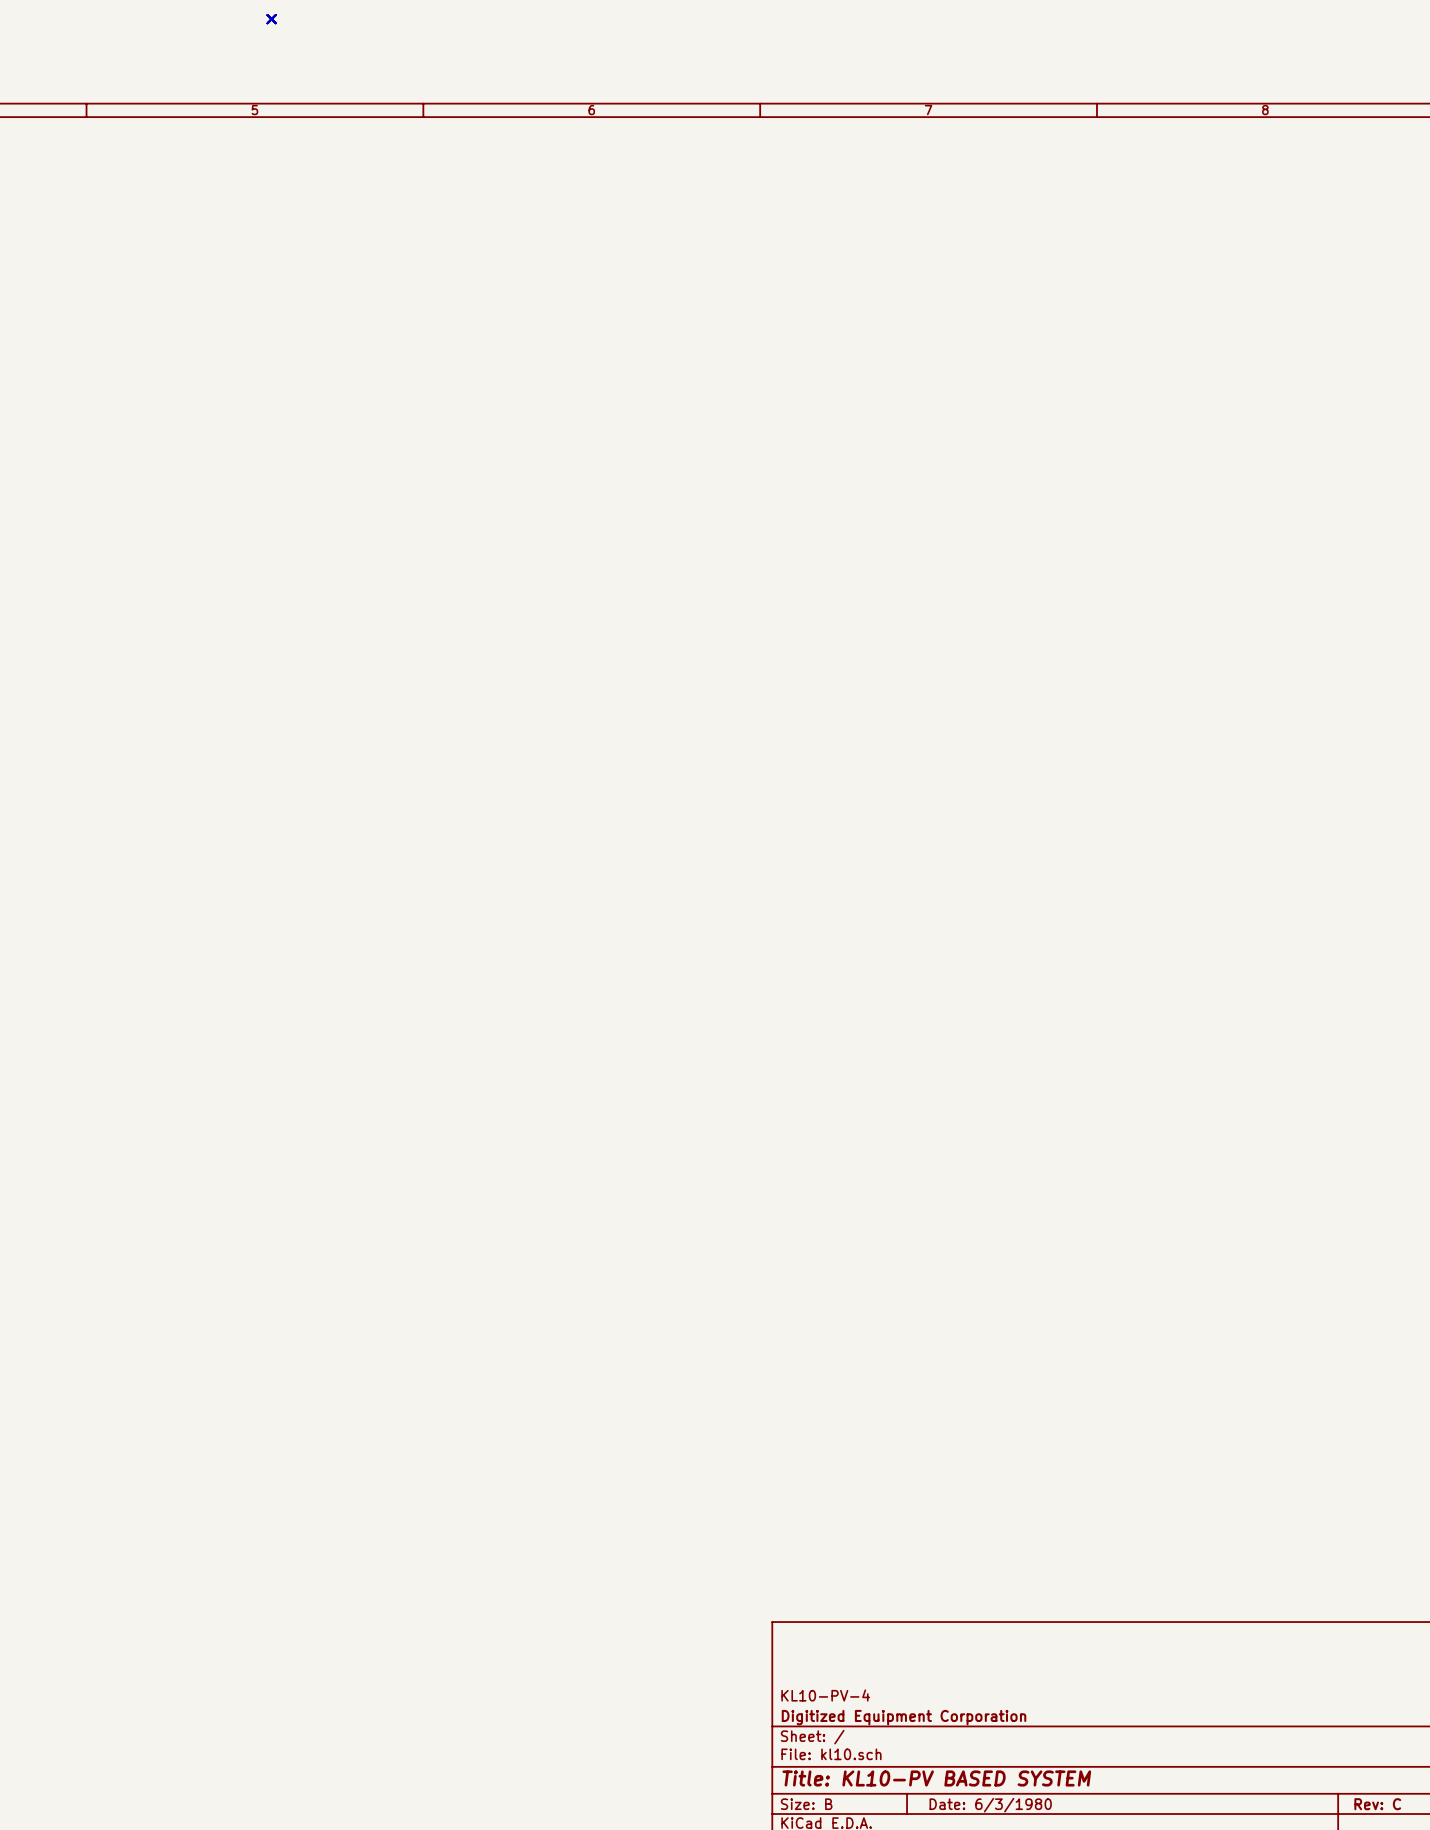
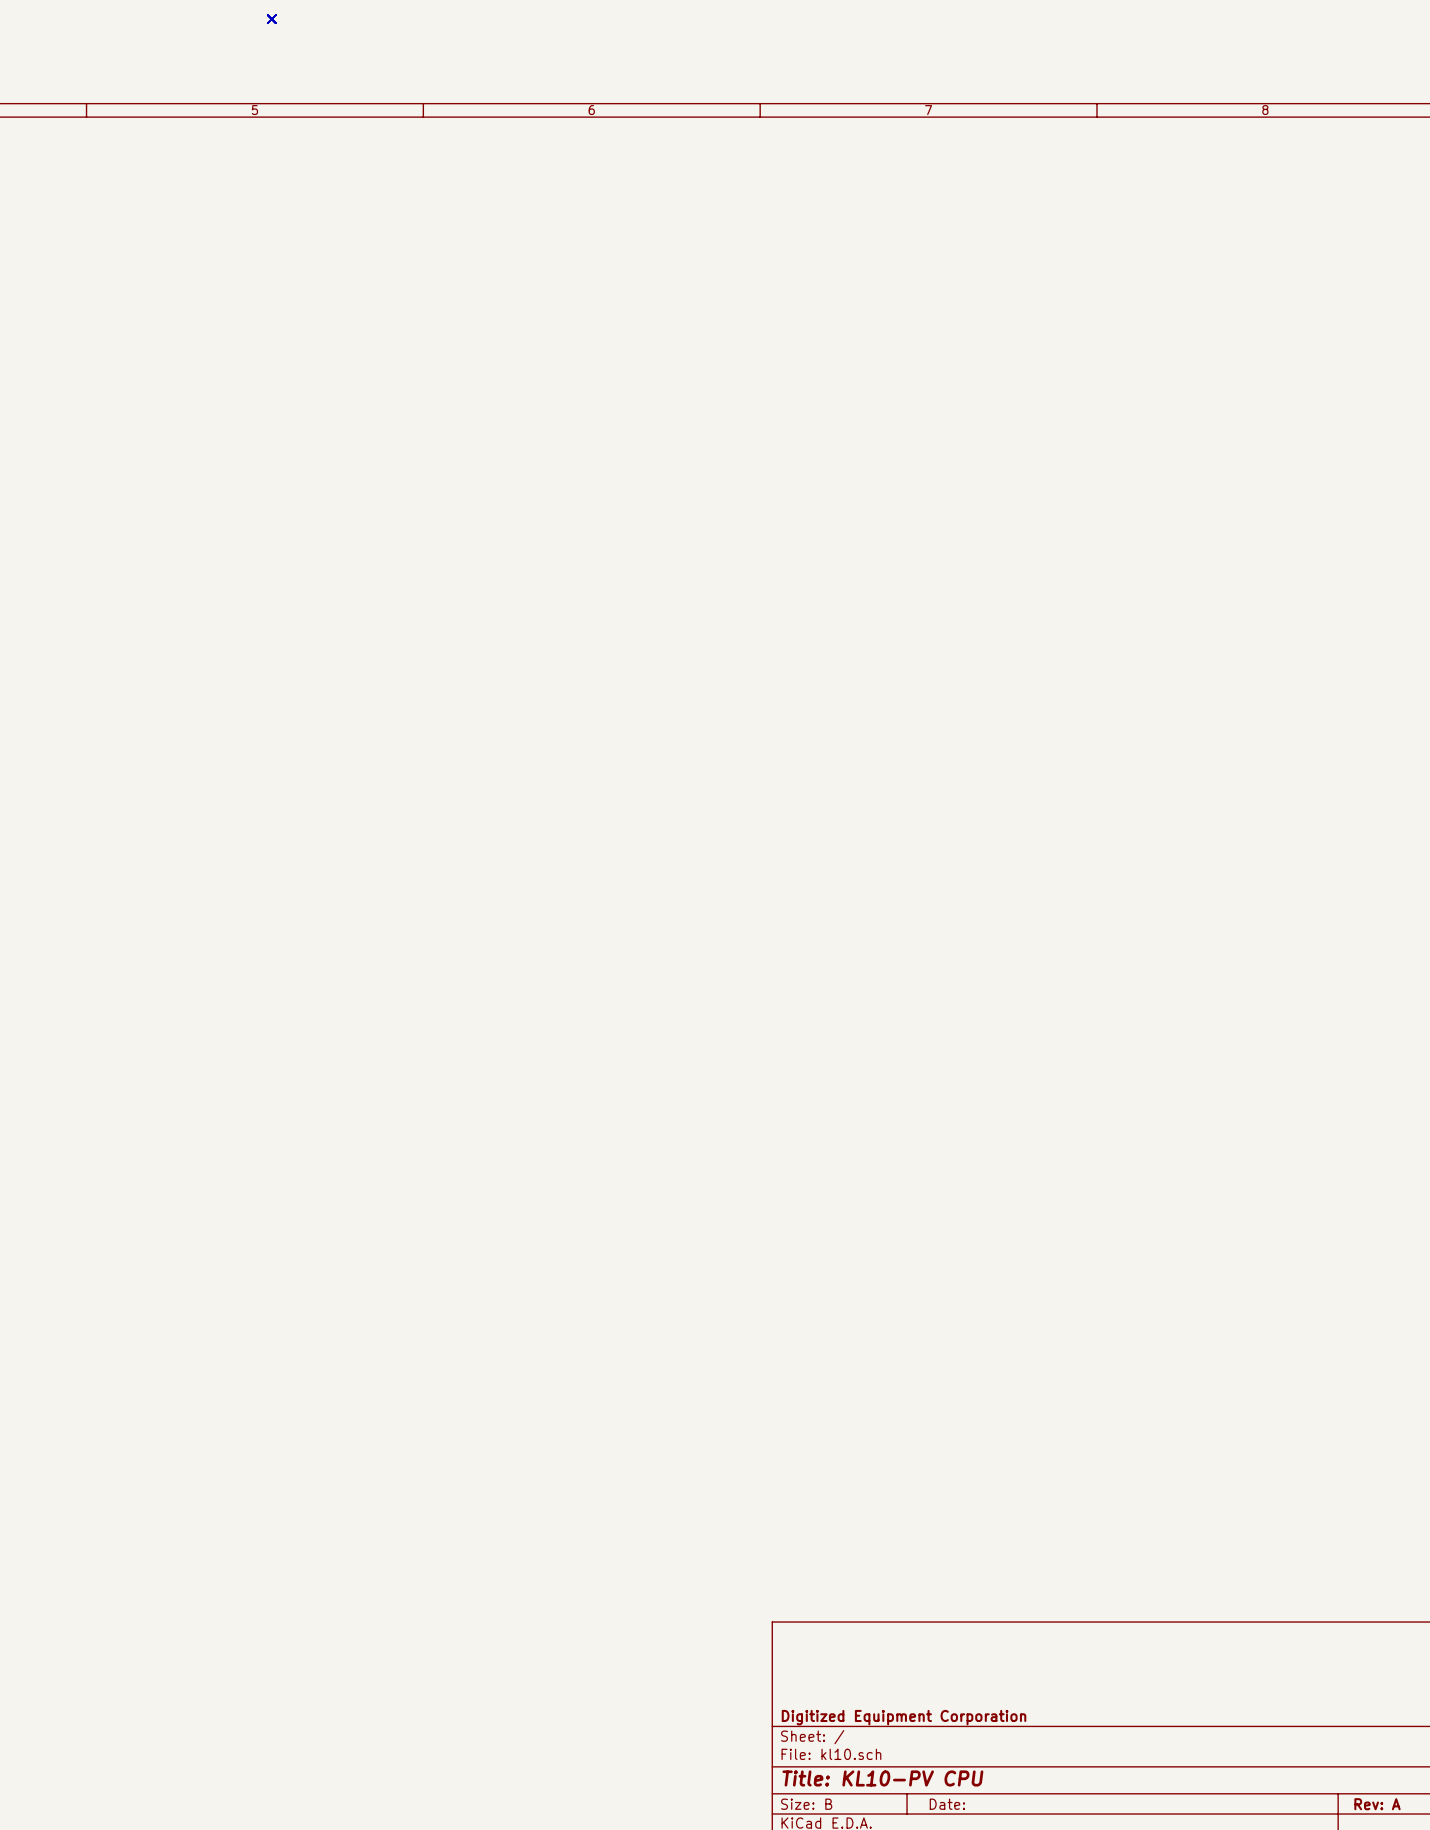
title block: KL10-PV-4 (825, 1695) -> none
title block: Title: KL10-PV BASED SYSTEM (936, 1778) -> Title: KL10-PV CPU (882, 1778)
title block: Rev: C (1377, 1804) -> Rev: A (1377, 1804)
title block: Date: 6/3/1980 (990, 1805) -> Date: (947, 1804)

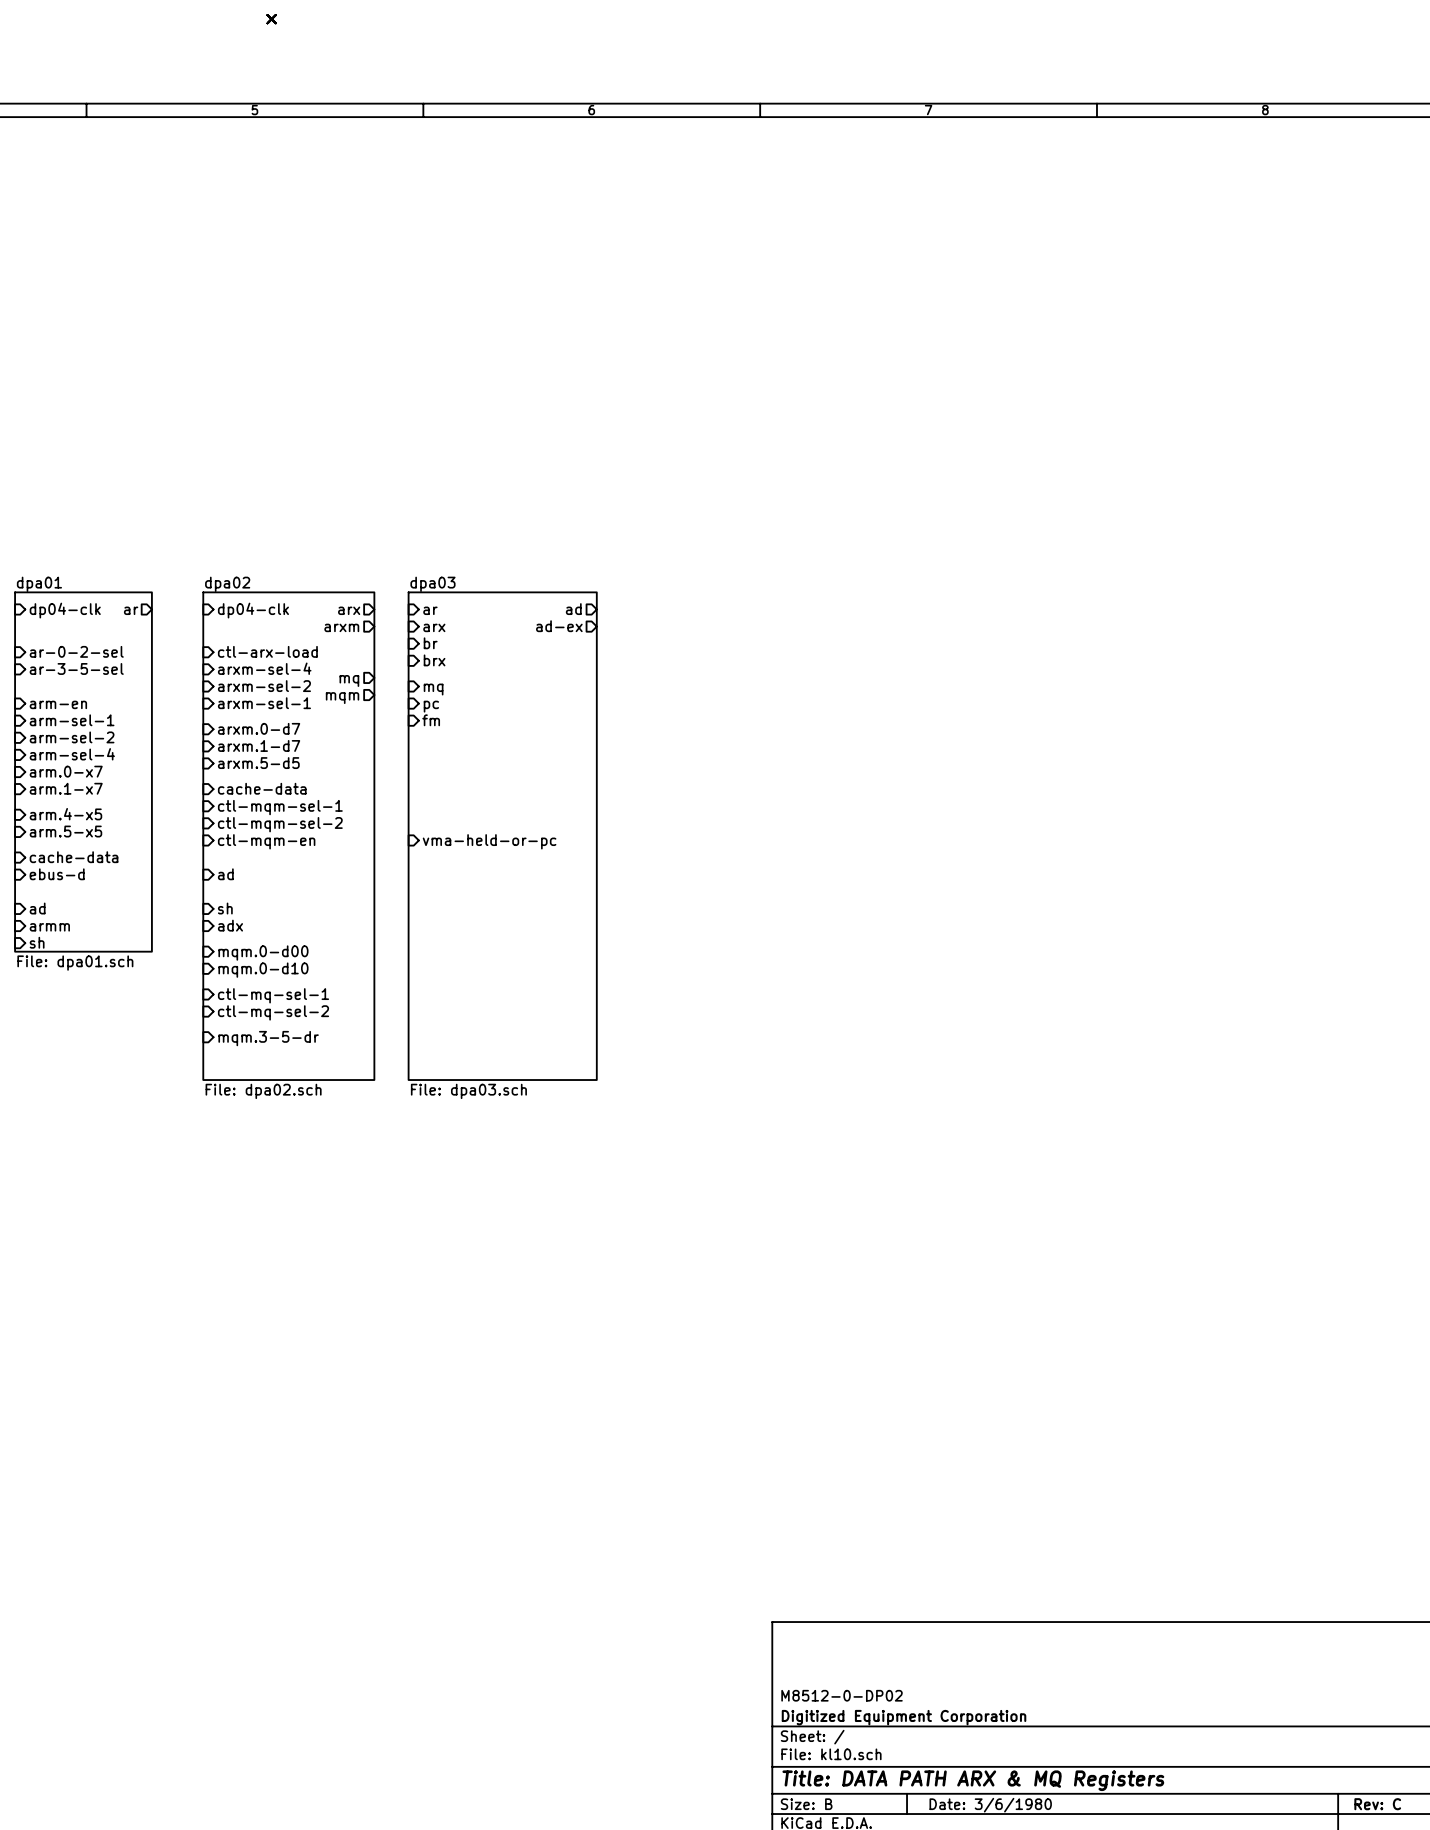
sheet pin: none -> ad (573, 609)
sheet pin: none -> dp04-clk (65, 610)
sheet pin: none -> ar (131, 610)
sheet pin: none -> dp04-clk (253, 610)
sheet pin: none -> arx (349, 610)
sheet pin: none -> ar (430, 610)
sheet pin: none -> ad-ex (559, 626)
sheet pin: none -> arxm (341, 627)
sheet pin: none -> arx (434, 627)
sheet pin: none -> br (430, 643)
sheet pin: none -> ar-0-2-sel (76, 651)
sheet pin: none -> ctl-arx-load (267, 651)
sheet pin: none -> brx (434, 660)
sheet pin: none -> ar-3-5-sel (76, 668)
sheet pin: none -> arxm-sel-4 (264, 668)
sheet pin: none -> mq (349, 680)
sheet pin: none -> arxm-sel-2 (264, 686)
sheet pin: none -> mq (433, 689)
sheet pin: none -> mqm (342, 698)
sheet pin: none -> arxm-sel-1 (264, 703)
sheet pin: none -> arm-en (58, 704)
sheet pin: none -> pc (431, 706)
sheet pin: none -> arm-sel-1 (72, 720)
sheet pin: none -> fm (431, 720)
sheet pin: none -> arxm.0-d7 (259, 728)
sheet pin: none -> arm-sel-2 (72, 737)
sheet pin: none -> arxm.1-d7 (259, 745)
sheet pin: none -> arm-sel-4 (72, 754)
sheet pin: none -> arxm.5-d5 (258, 763)
sheet pin: none -> arm.0-x7 (66, 771)
sheet dpa01: none -> File: dpa01.sch (83, 772)
sheet pin: none -> arm.1-x7 (66, 788)
sheet pin: none -> cache-data (262, 788)
sheet pin: none -> ctl-mqm-sel-1 (280, 807)
sheet pin: none -> arm.4-x5 (65, 814)
sheet pin: none -> ctl-mqm-sel-2 (280, 824)
sheet pin: none -> arm.5-x5 (65, 831)
sheet dpa02: none -> File: dpa02.sch (288, 836)
sheet dpa03: none -> File: dpa03.sch (502, 836)
sheet pin: none -> ctl-mqm-en (266, 841)
sheet pin: none -> vma-held-or-pc (489, 841)
sheet pin: none -> cache-data (74, 857)
sheet pin: none -> ebus-d (57, 874)
sheet pin: none -> ad (225, 874)
sheet pin: none -> ad (37, 908)
sheet pin: none -> sh (225, 908)
sheet pin: none -> adx (230, 925)
sheet pin: none -> armm (49, 927)
sheet pin: none -> sh (37, 942)
sheet pin: none -> mqm.0-d00 (263, 953)
sheet pin: none -> mqm.0-d10 (263, 970)
sheet pin: none -> ctl-mq-sel-1 (273, 995)
sheet pin: none -> ctl-mq-sel-2 (273, 1012)
sheet pin: none -> mqm.3-5-dr (268, 1038)
title block: none -> M8512-0-DP02 (842, 1695)
title block: Title: KL10-PV CPU (882, 1778) -> Title: DATA PATH ARX & MQ Registers (973, 1780)
title block: Date: (947, 1804) -> Date: 3/6/1980 (990, 1805)
title block: Rev: A (1377, 1804) -> Rev: C (1377, 1804)

